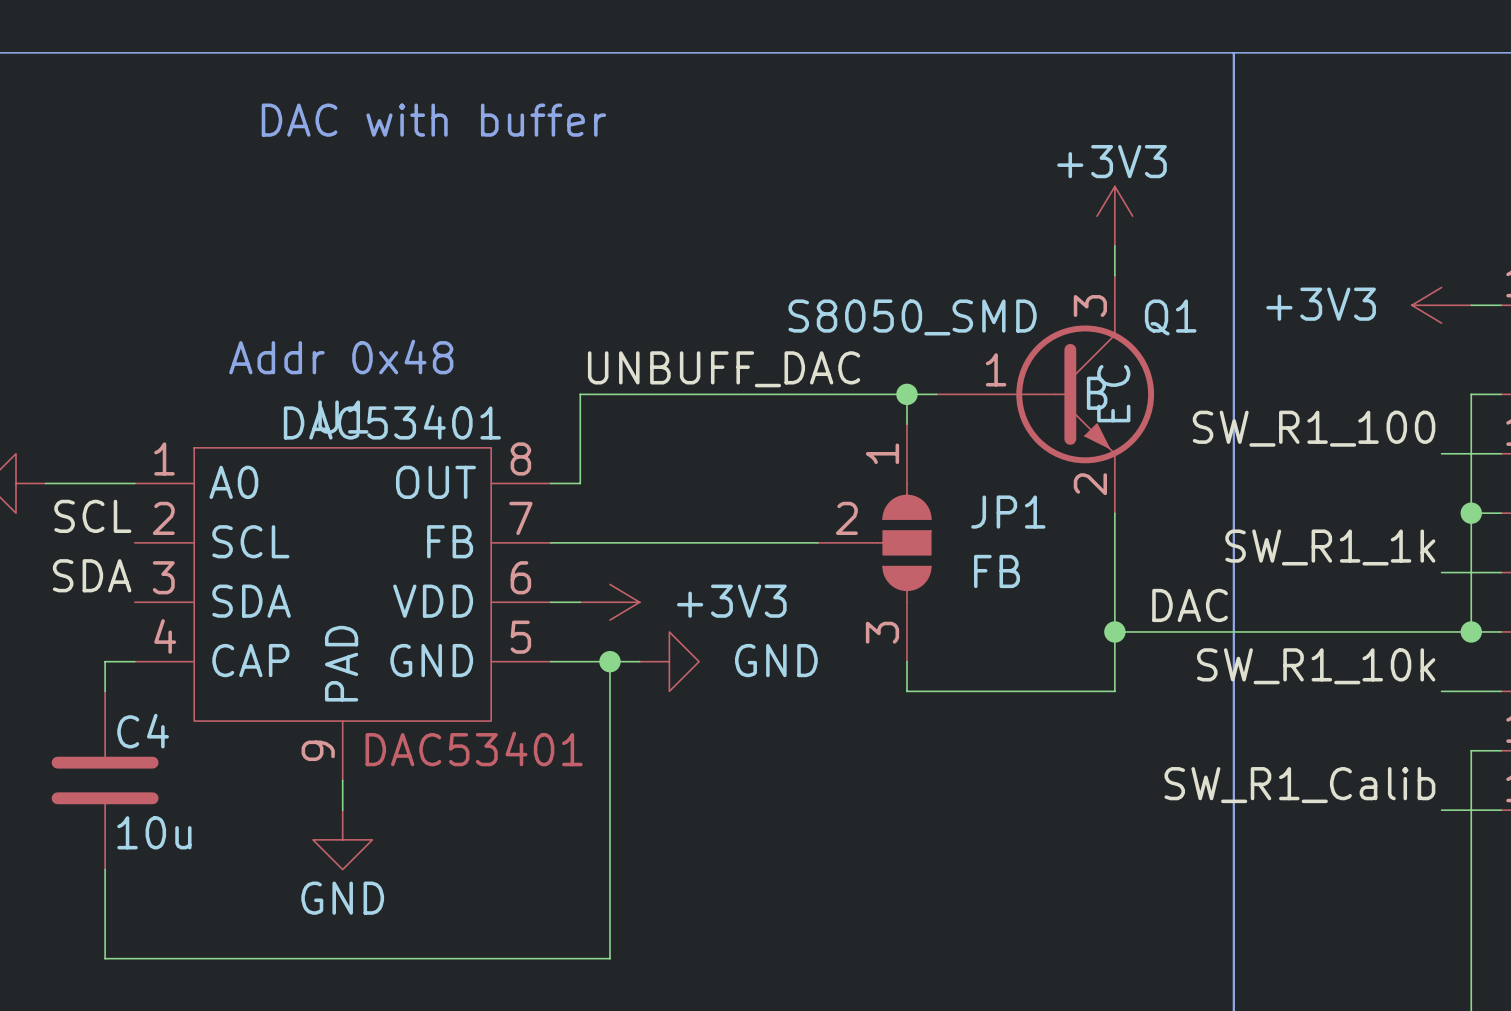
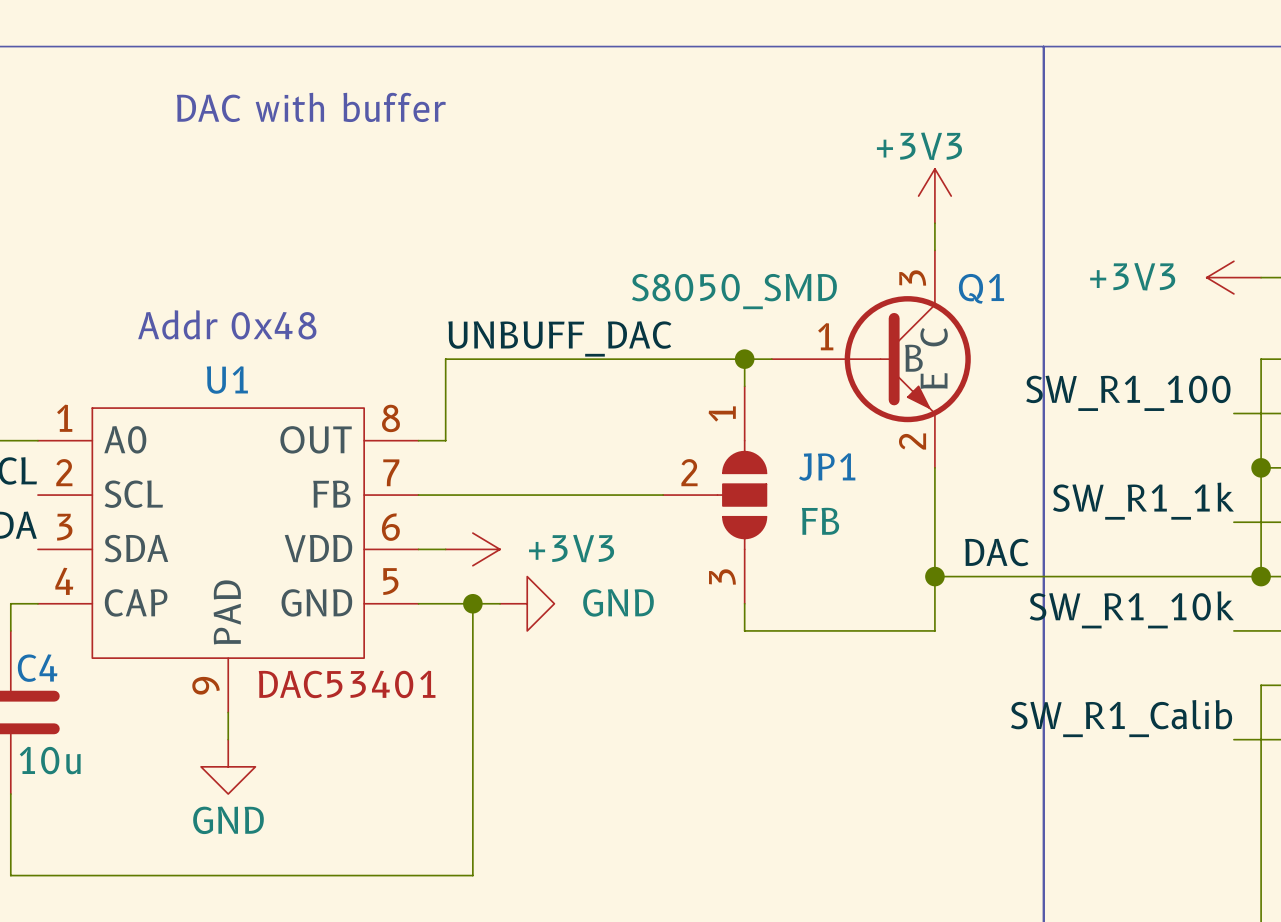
U1 value: DAC53401 (392, 422) -> none

